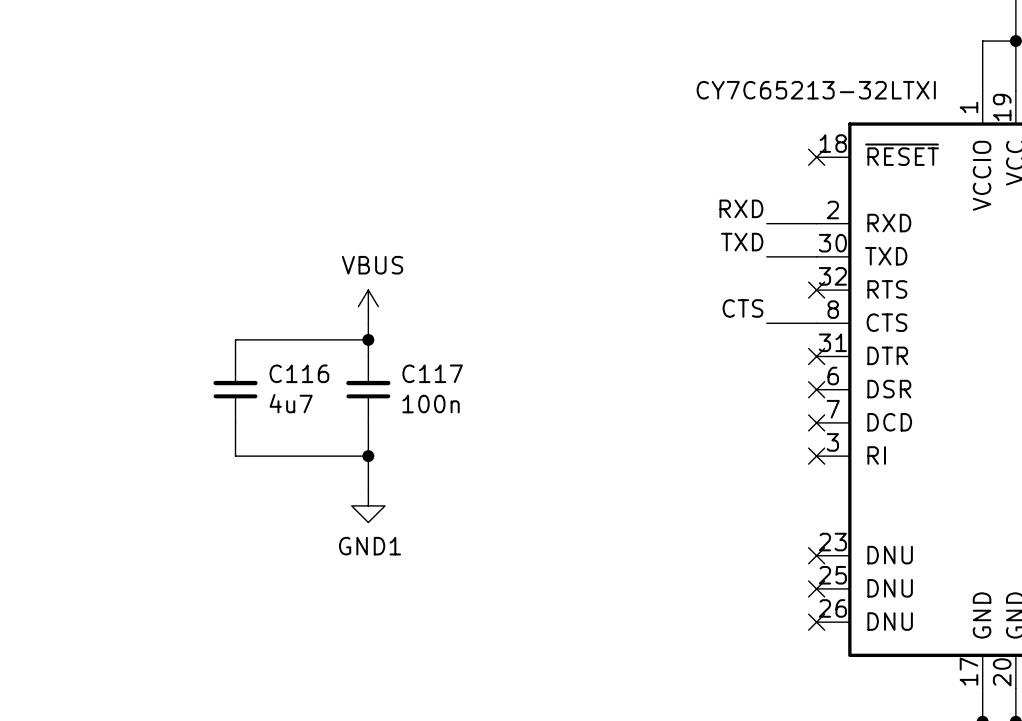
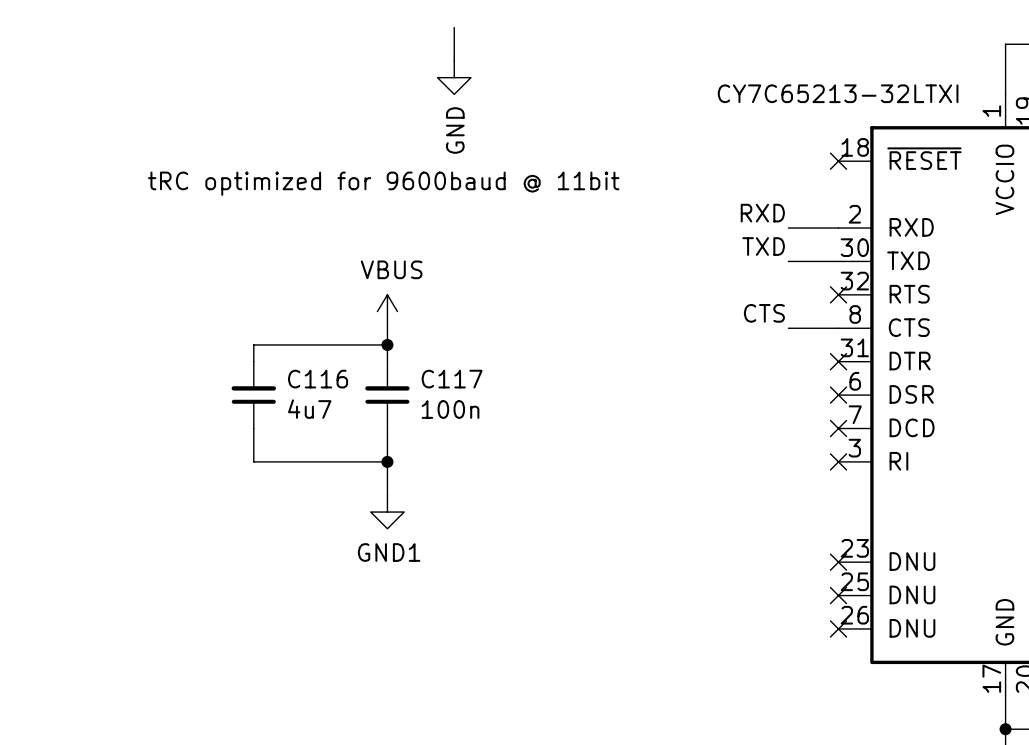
wire: none -> (454, 27) (454, 60)
power symbol: none -> GND (454, 77)
text: none -> tRC optimized for 9600baud @ 11bit (383, 183)

